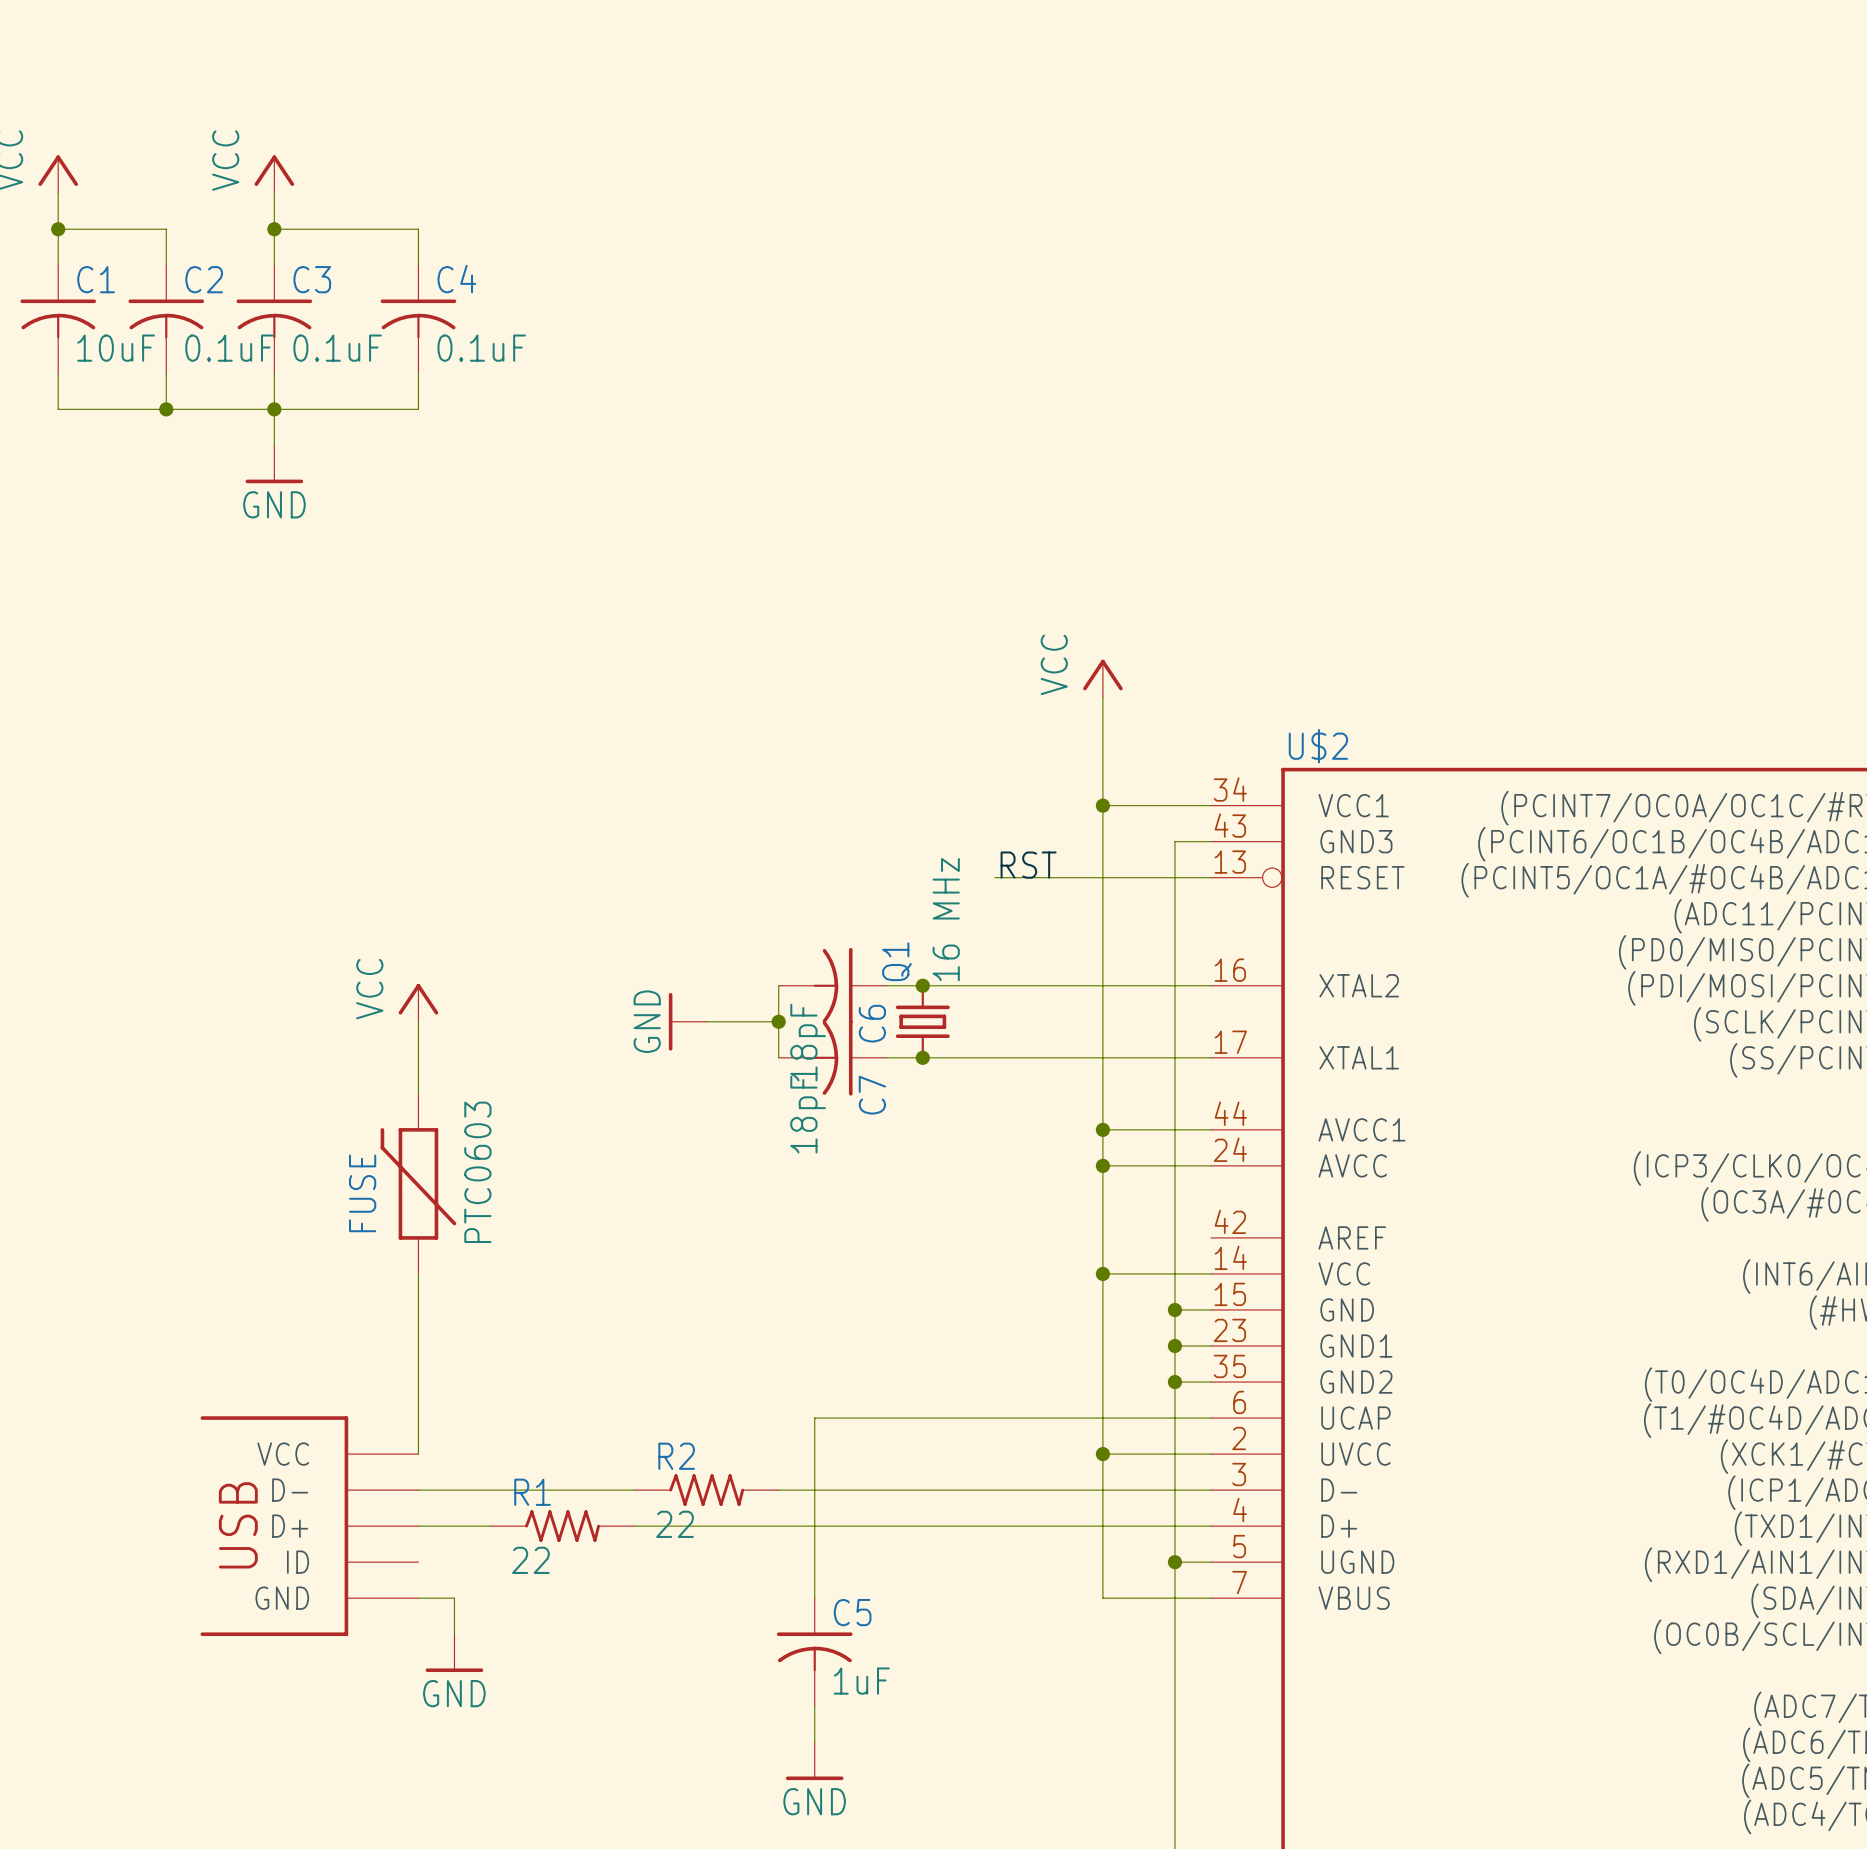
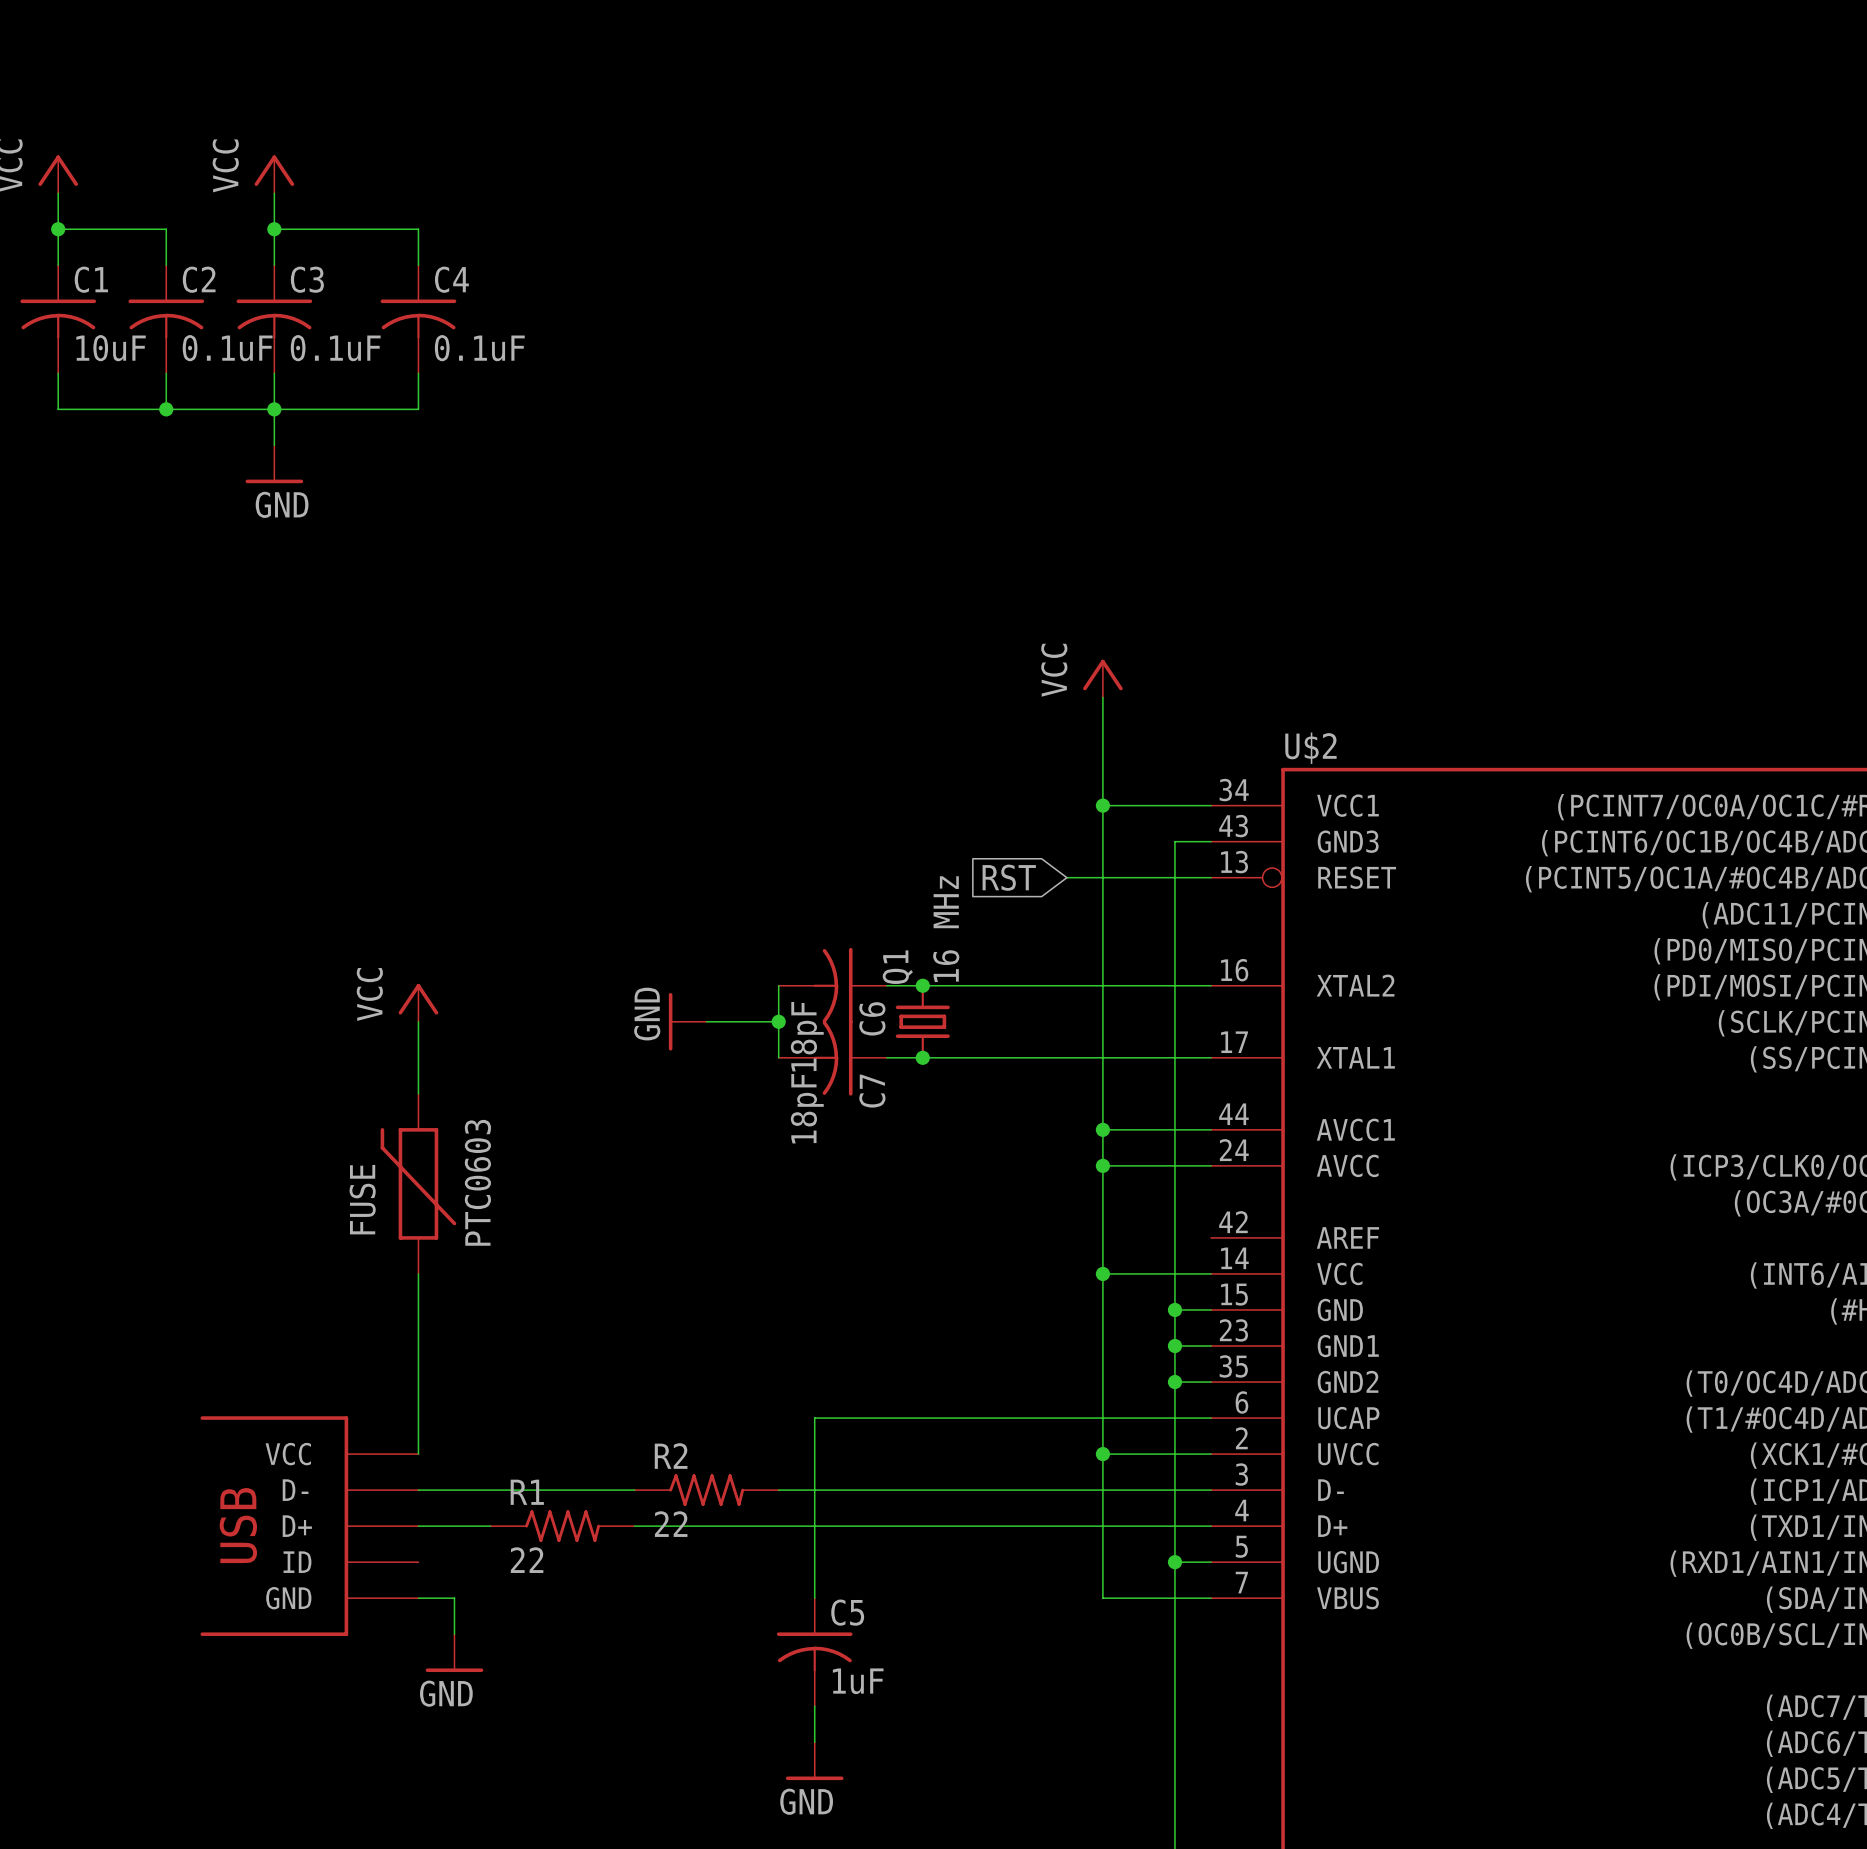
label: RST (1028, 865) -> none
wire: (994, 877) (1066, 877) -> none
global label: none -> RST (1009, 877)

